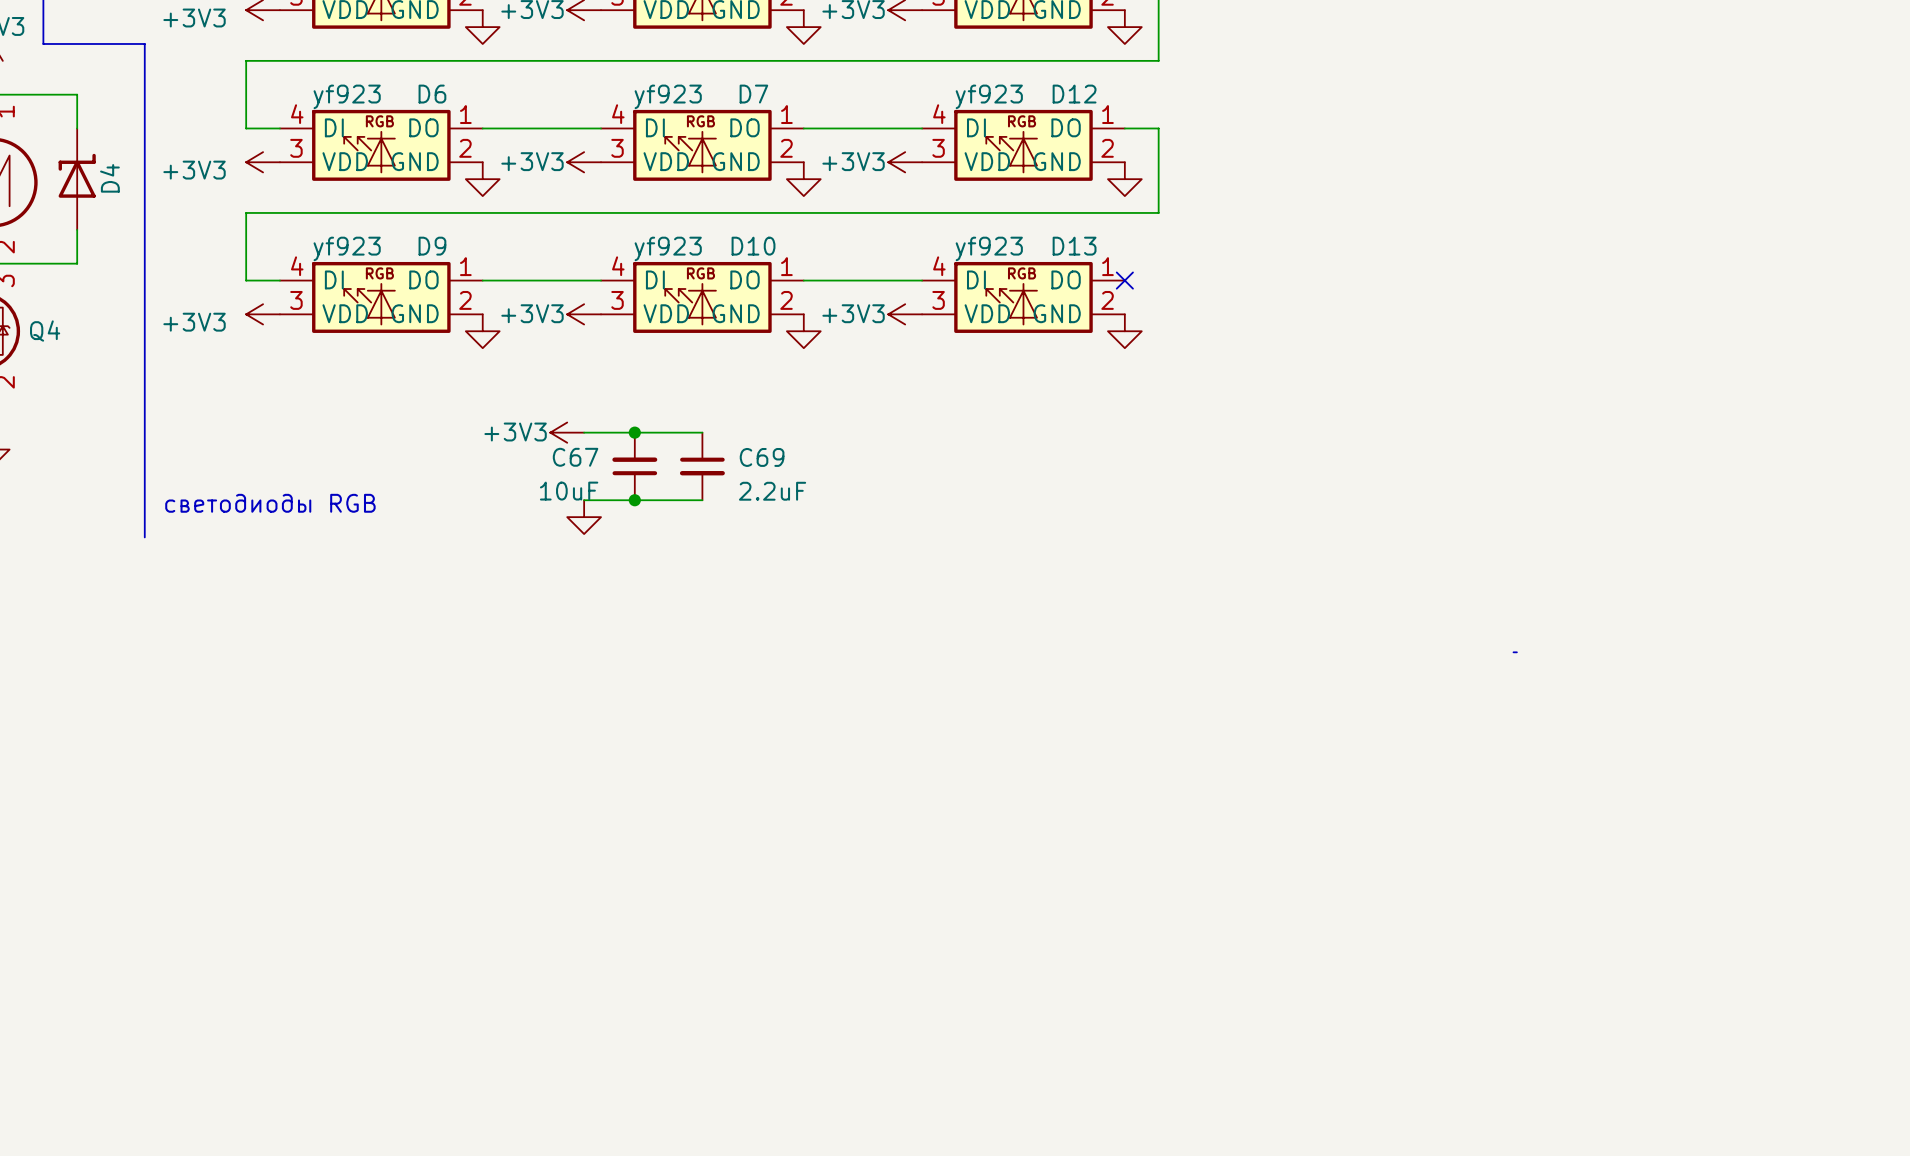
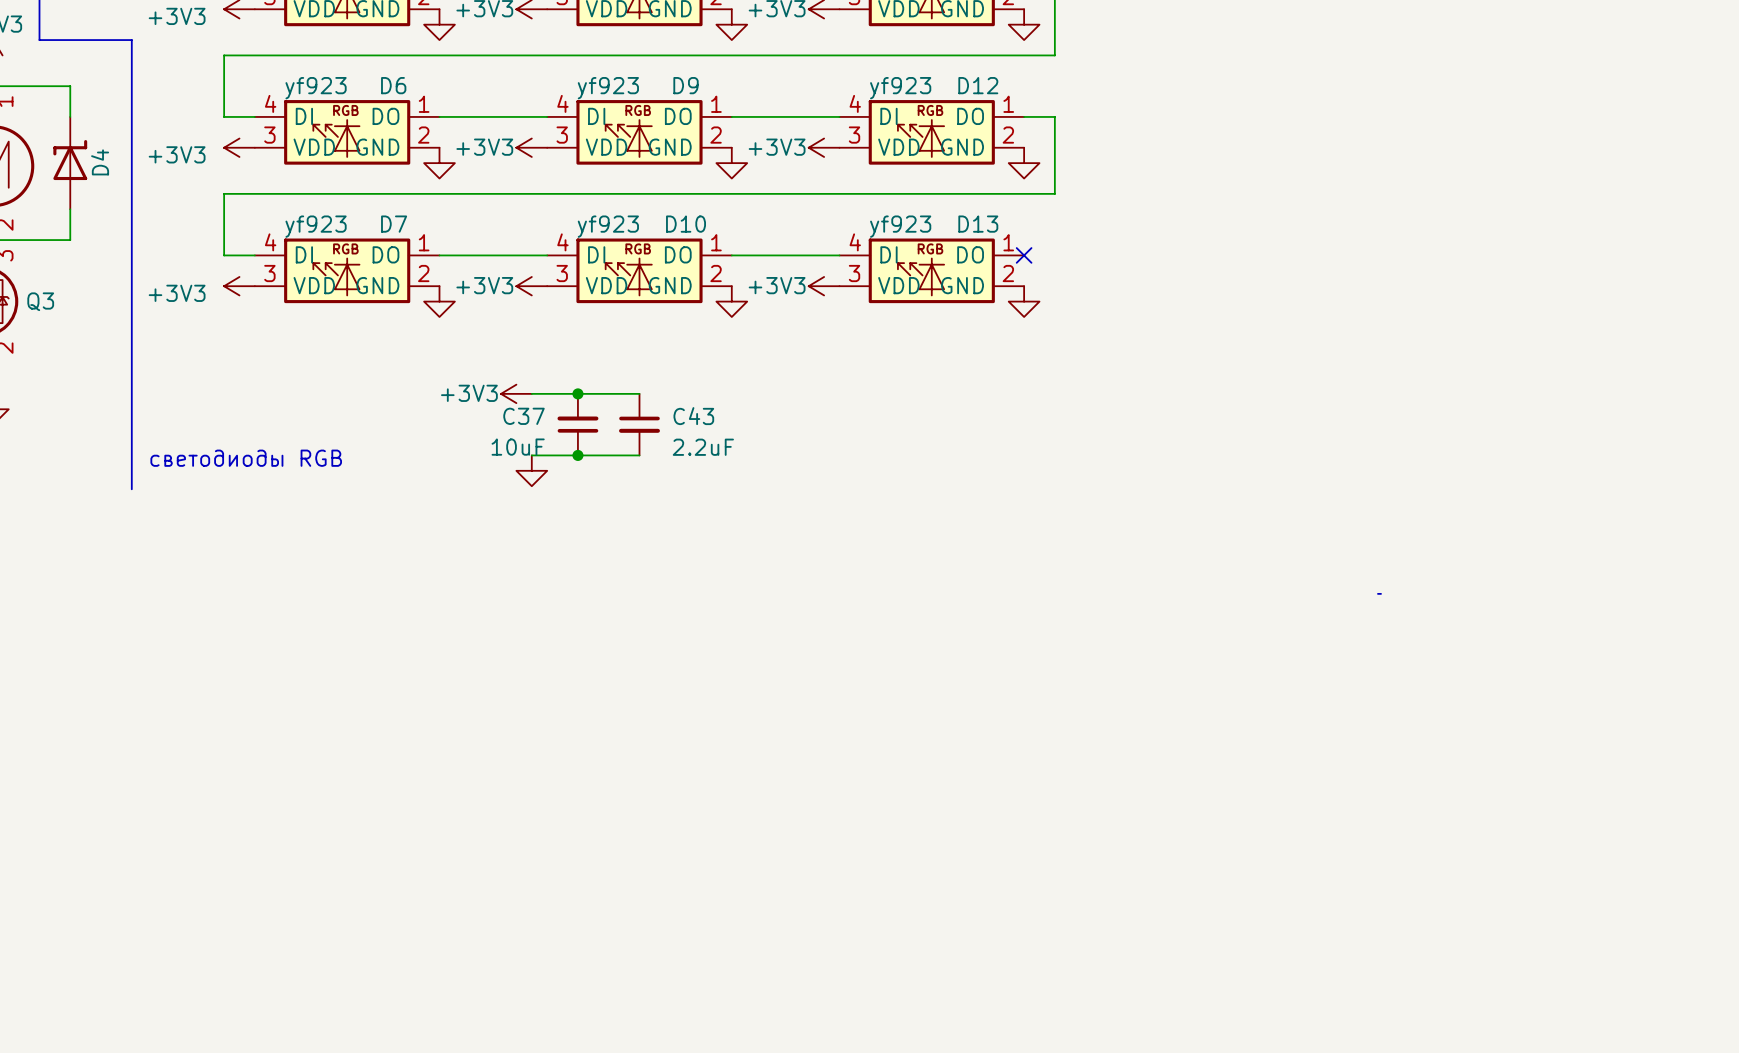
D7 name: D7 (753, 94) -> D9 (686, 85)
D9 name: D9 (432, 246) -> D7 (394, 224)
Q4 name: Q4 (45, 331) -> Q3 (40, 301)
C67 name: C67 (575, 457) -> C37 (523, 416)
C69 name: C69 (762, 457) -> C43 (693, 416)

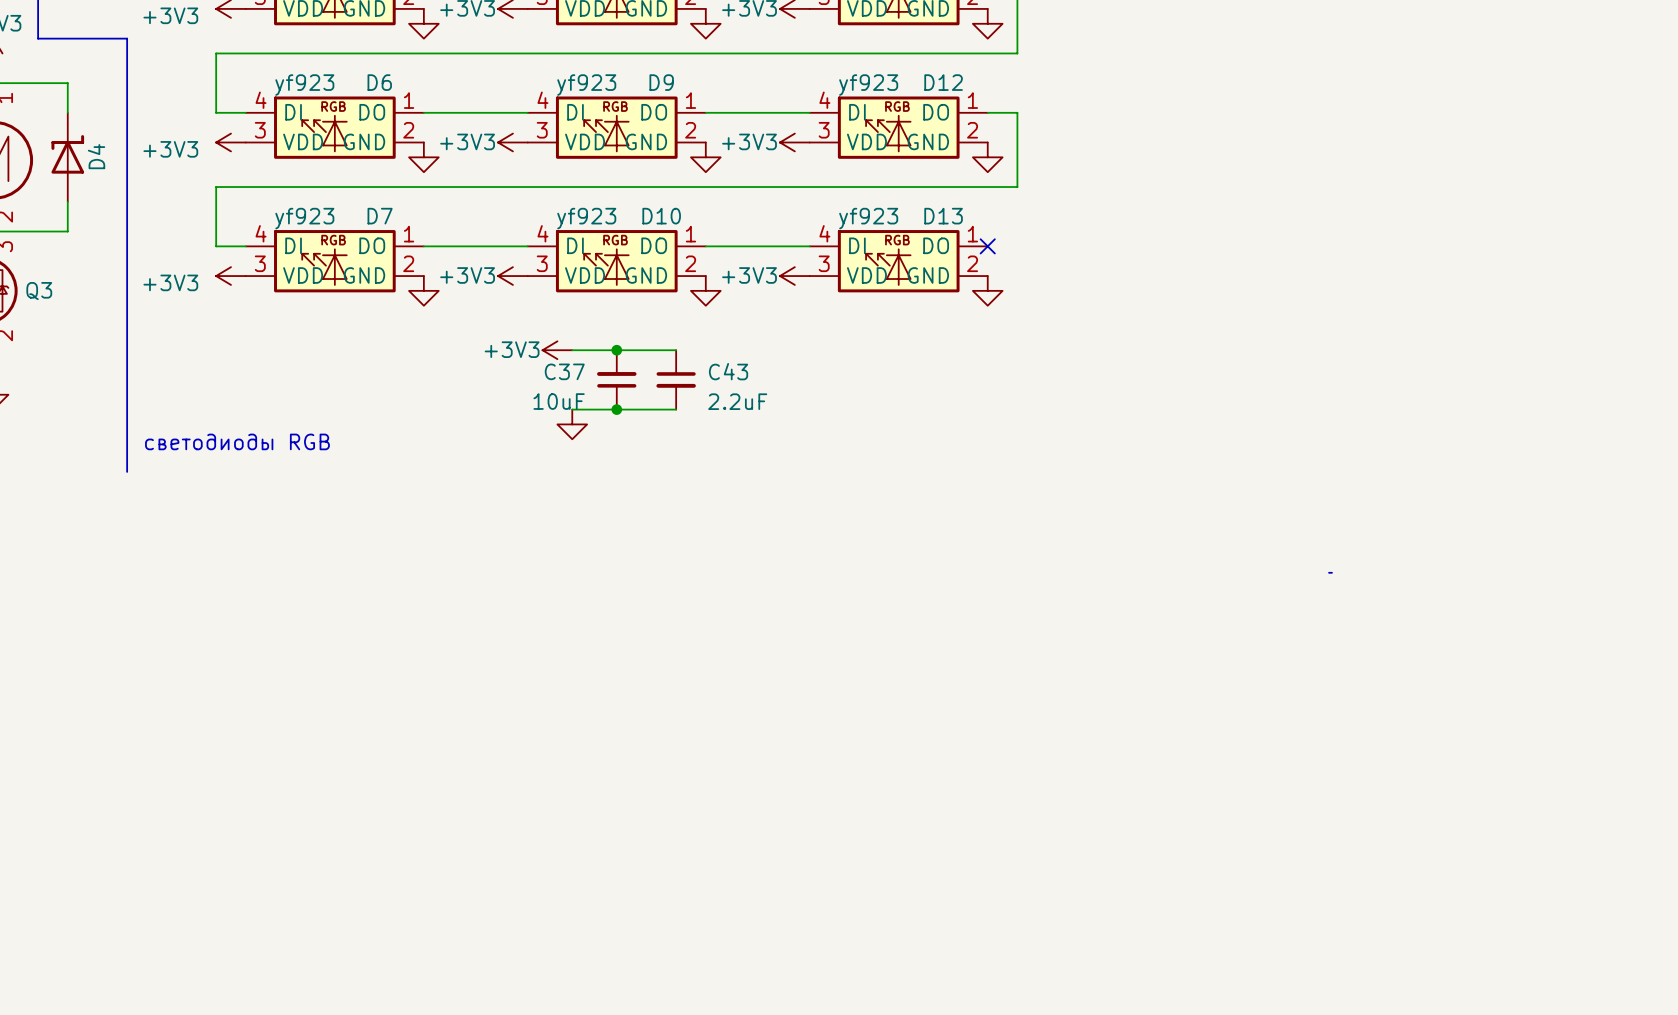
junction: none -> (616, 350)
power symbol position: +3V3 (516, 393) -> +3V3 (557, 350)
wire: (531, 393) (639, 393) -> (572, 350) (676, 350)
junction: (577, 393) -> none
C37 position: (577, 424) -> (616, 379)
junction: none -> (616, 409)
C43 position: (639, 424) -> (676, 379)
wire: (531, 455) (639, 455) -> (572, 409) (676, 409)
junction: (577, 455) -> none
power symbol position: (531, 470) -> (572, 424)

